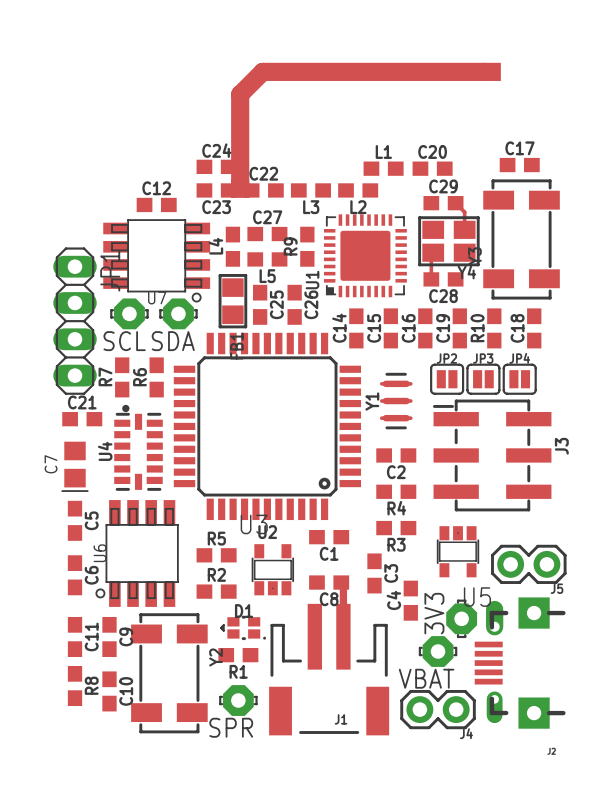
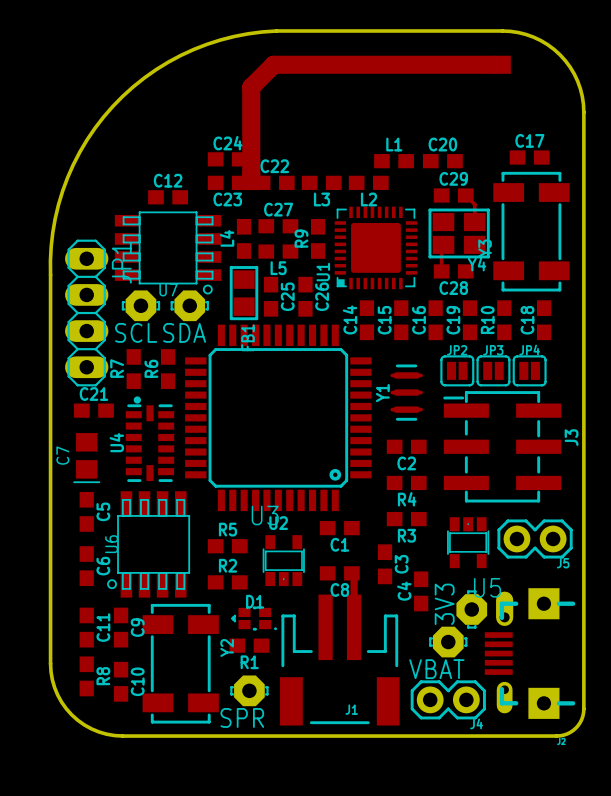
board edge: none -> (276, 30) (518, 32) (533, 37) (554, 49) (565, 60) (577, 81) (582, 96) (583, 112) (583, 708) (580, 722) (567, 733) (556, 736) (114, 735) (91, 728) (77, 720) (61, 702) (54, 687) (50, 663) (50, 260) (55, 218) (62, 191) (79, 152) (95, 128) (122, 96) (144, 77) (180, 55) (207, 44) (248, 33) (276, 30)
J5 position: (528, 564) -> (535, 538)

